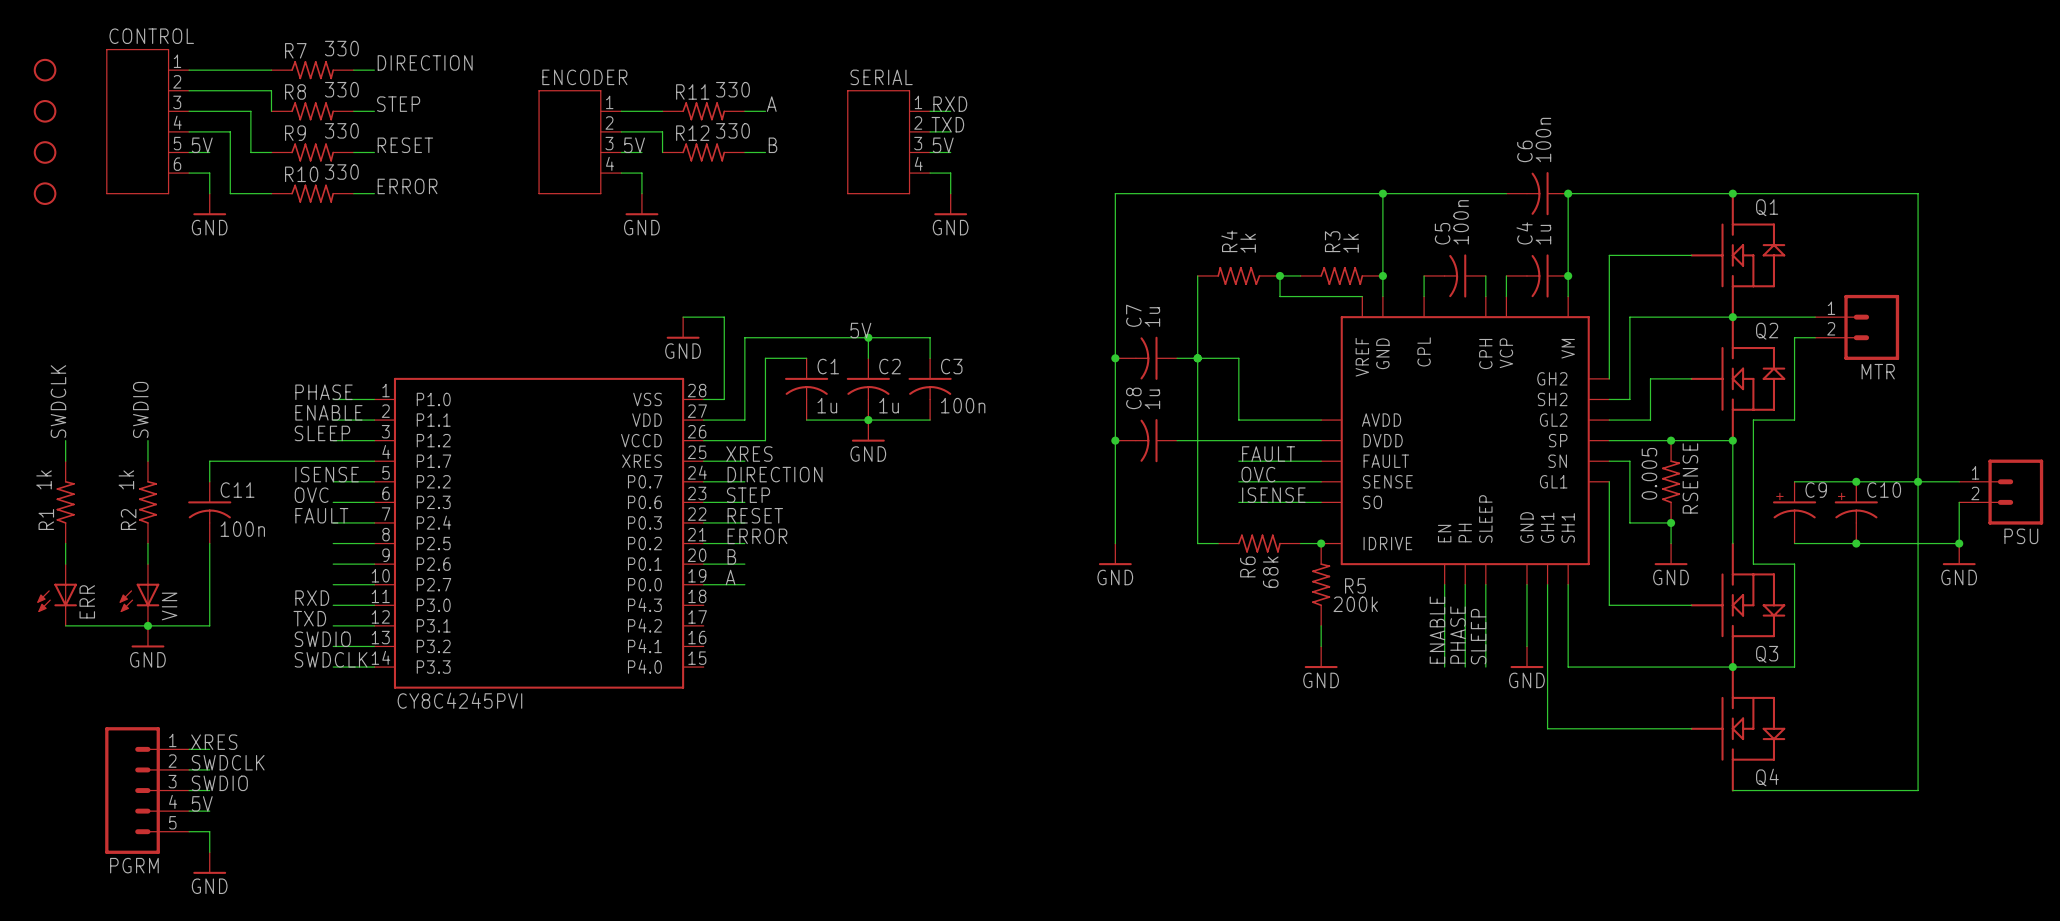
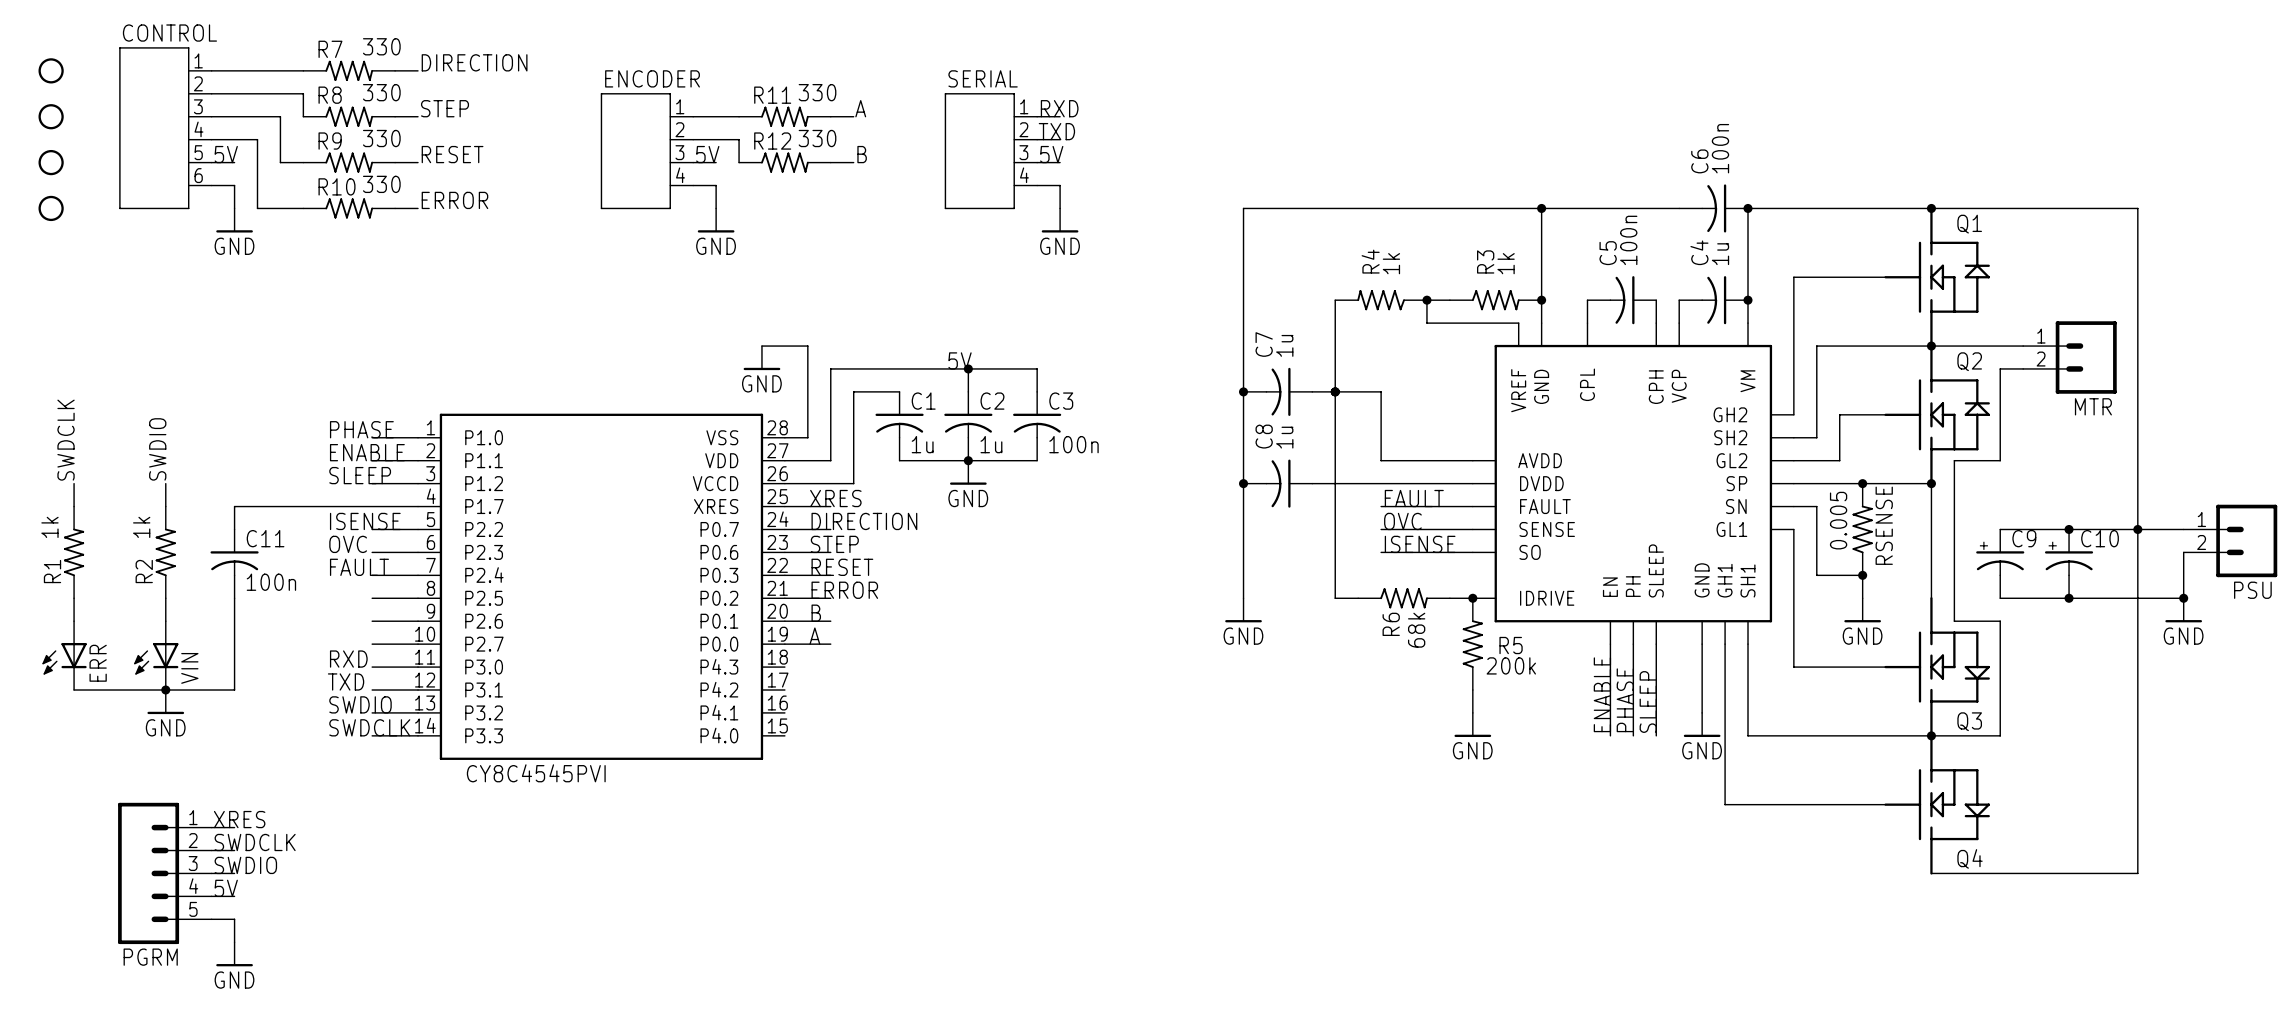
text: CY8C4245PVI (459, 700) -> none
part value: none -> CY8C4545PVI (536, 773)

